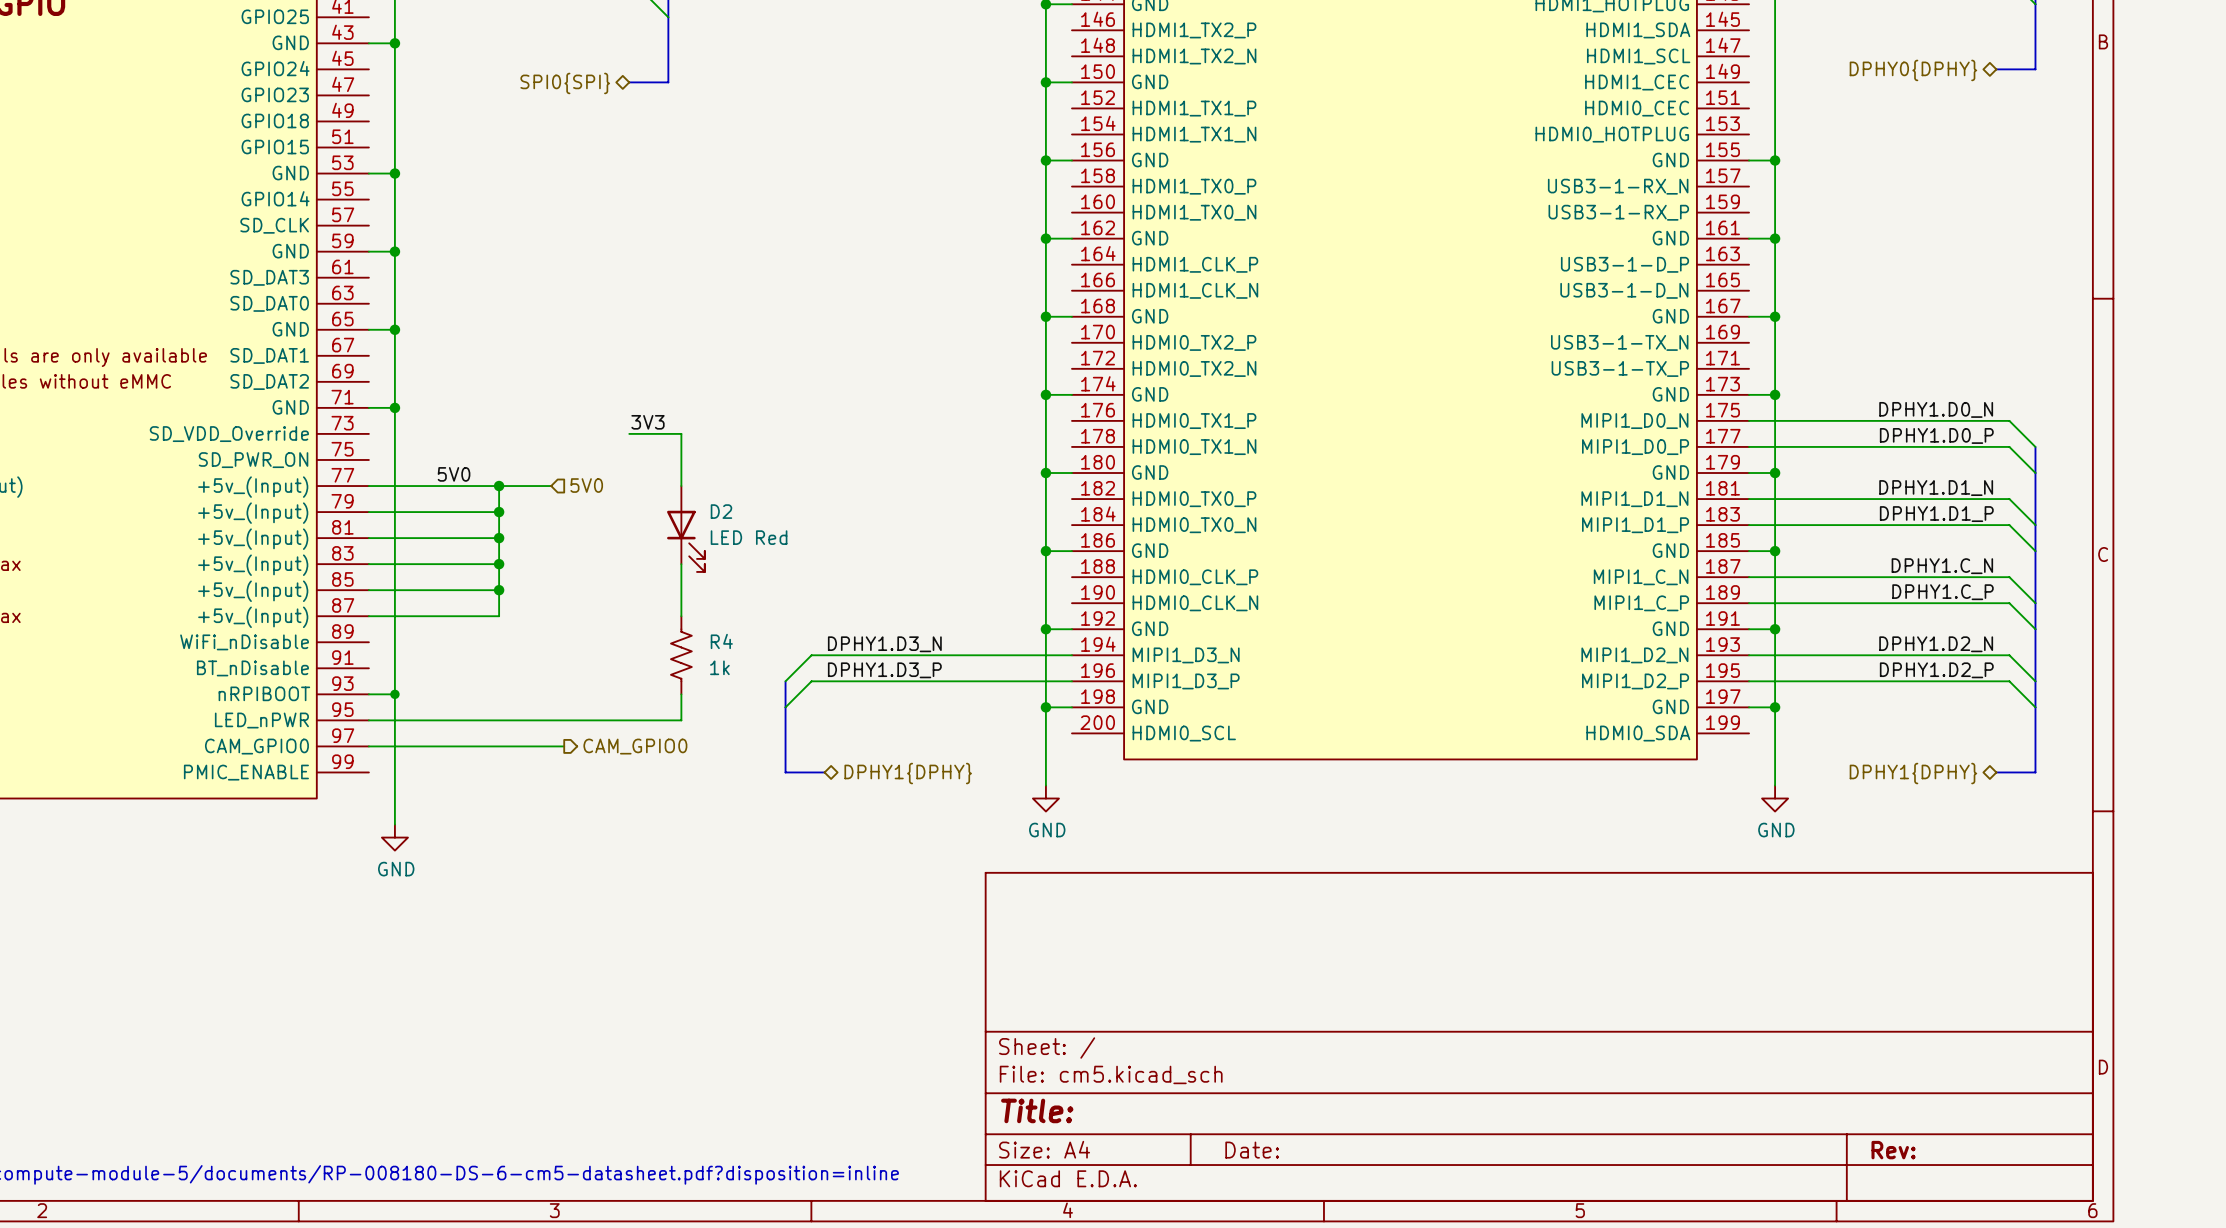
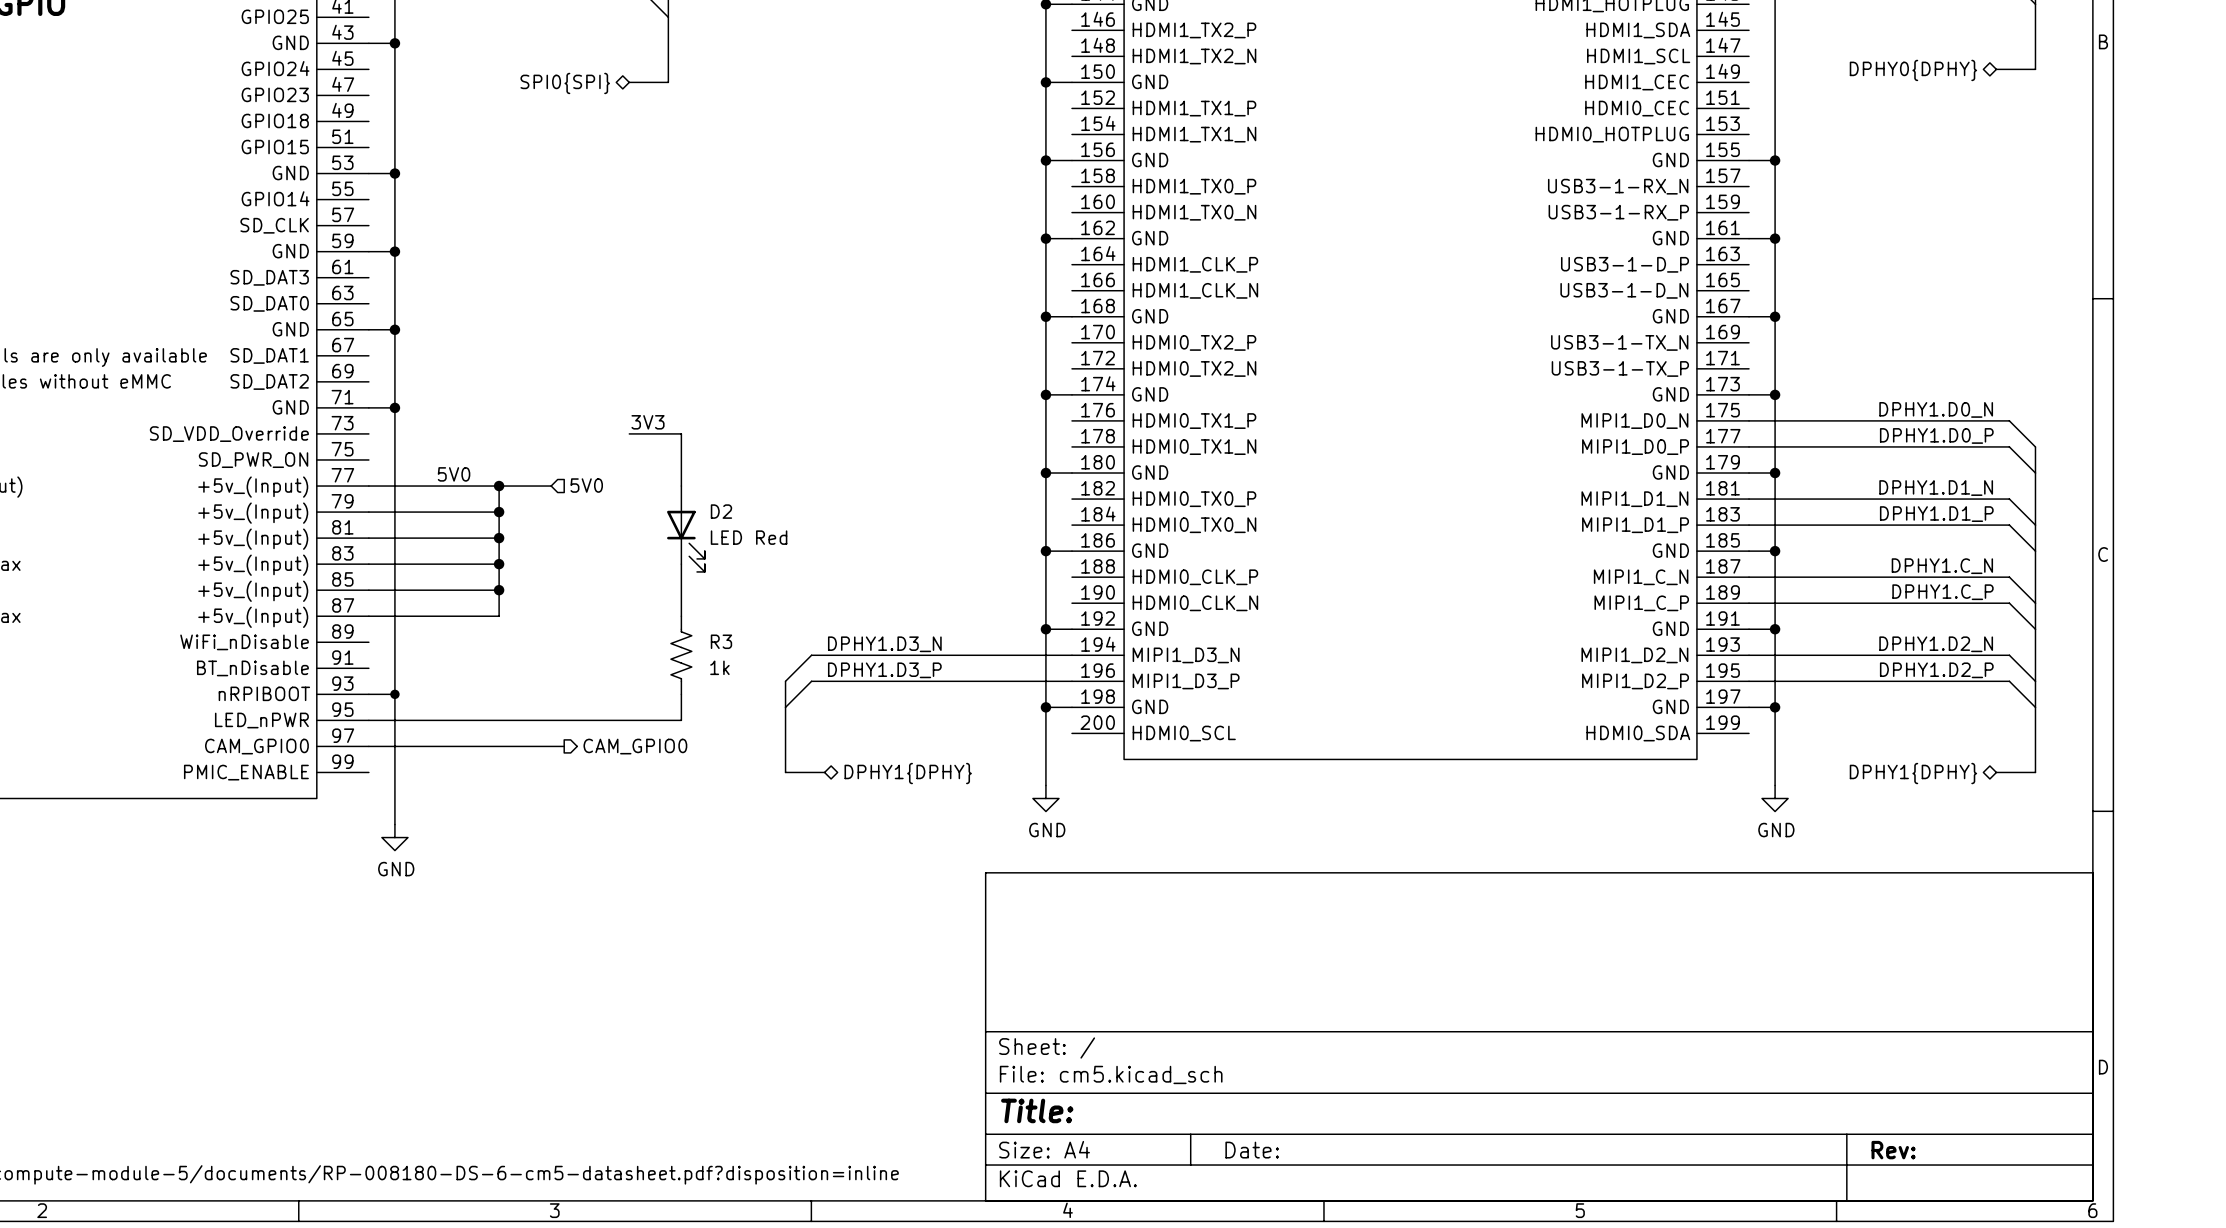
R4 name: R4 (721, 641) -> R3 (721, 641)

